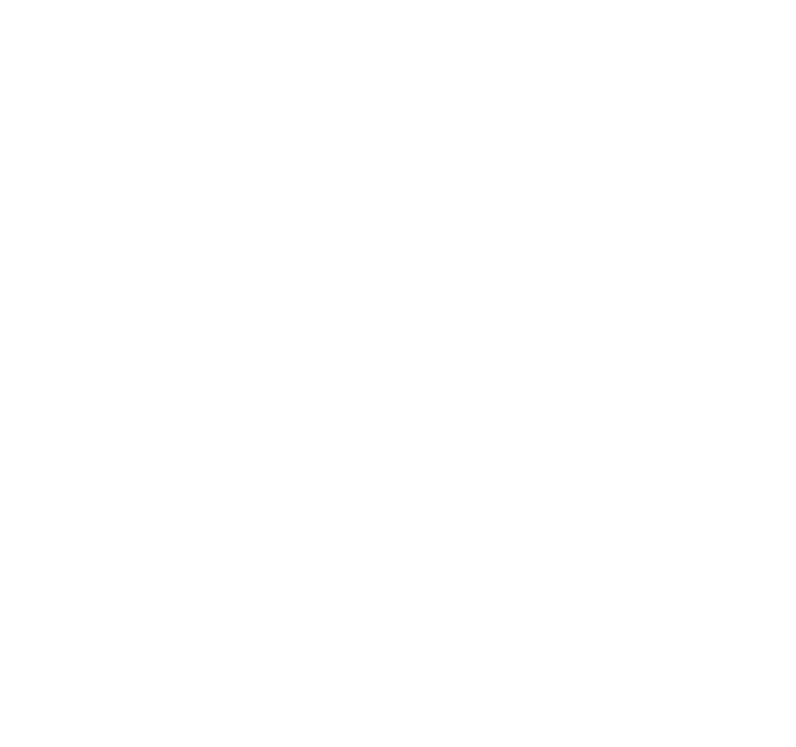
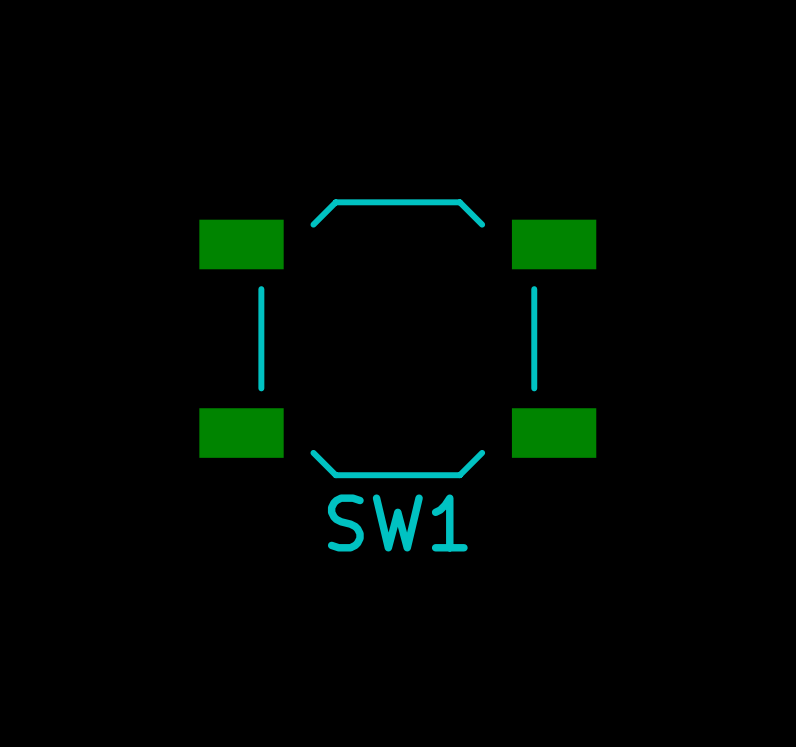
SW1: none -> (397, 338)

